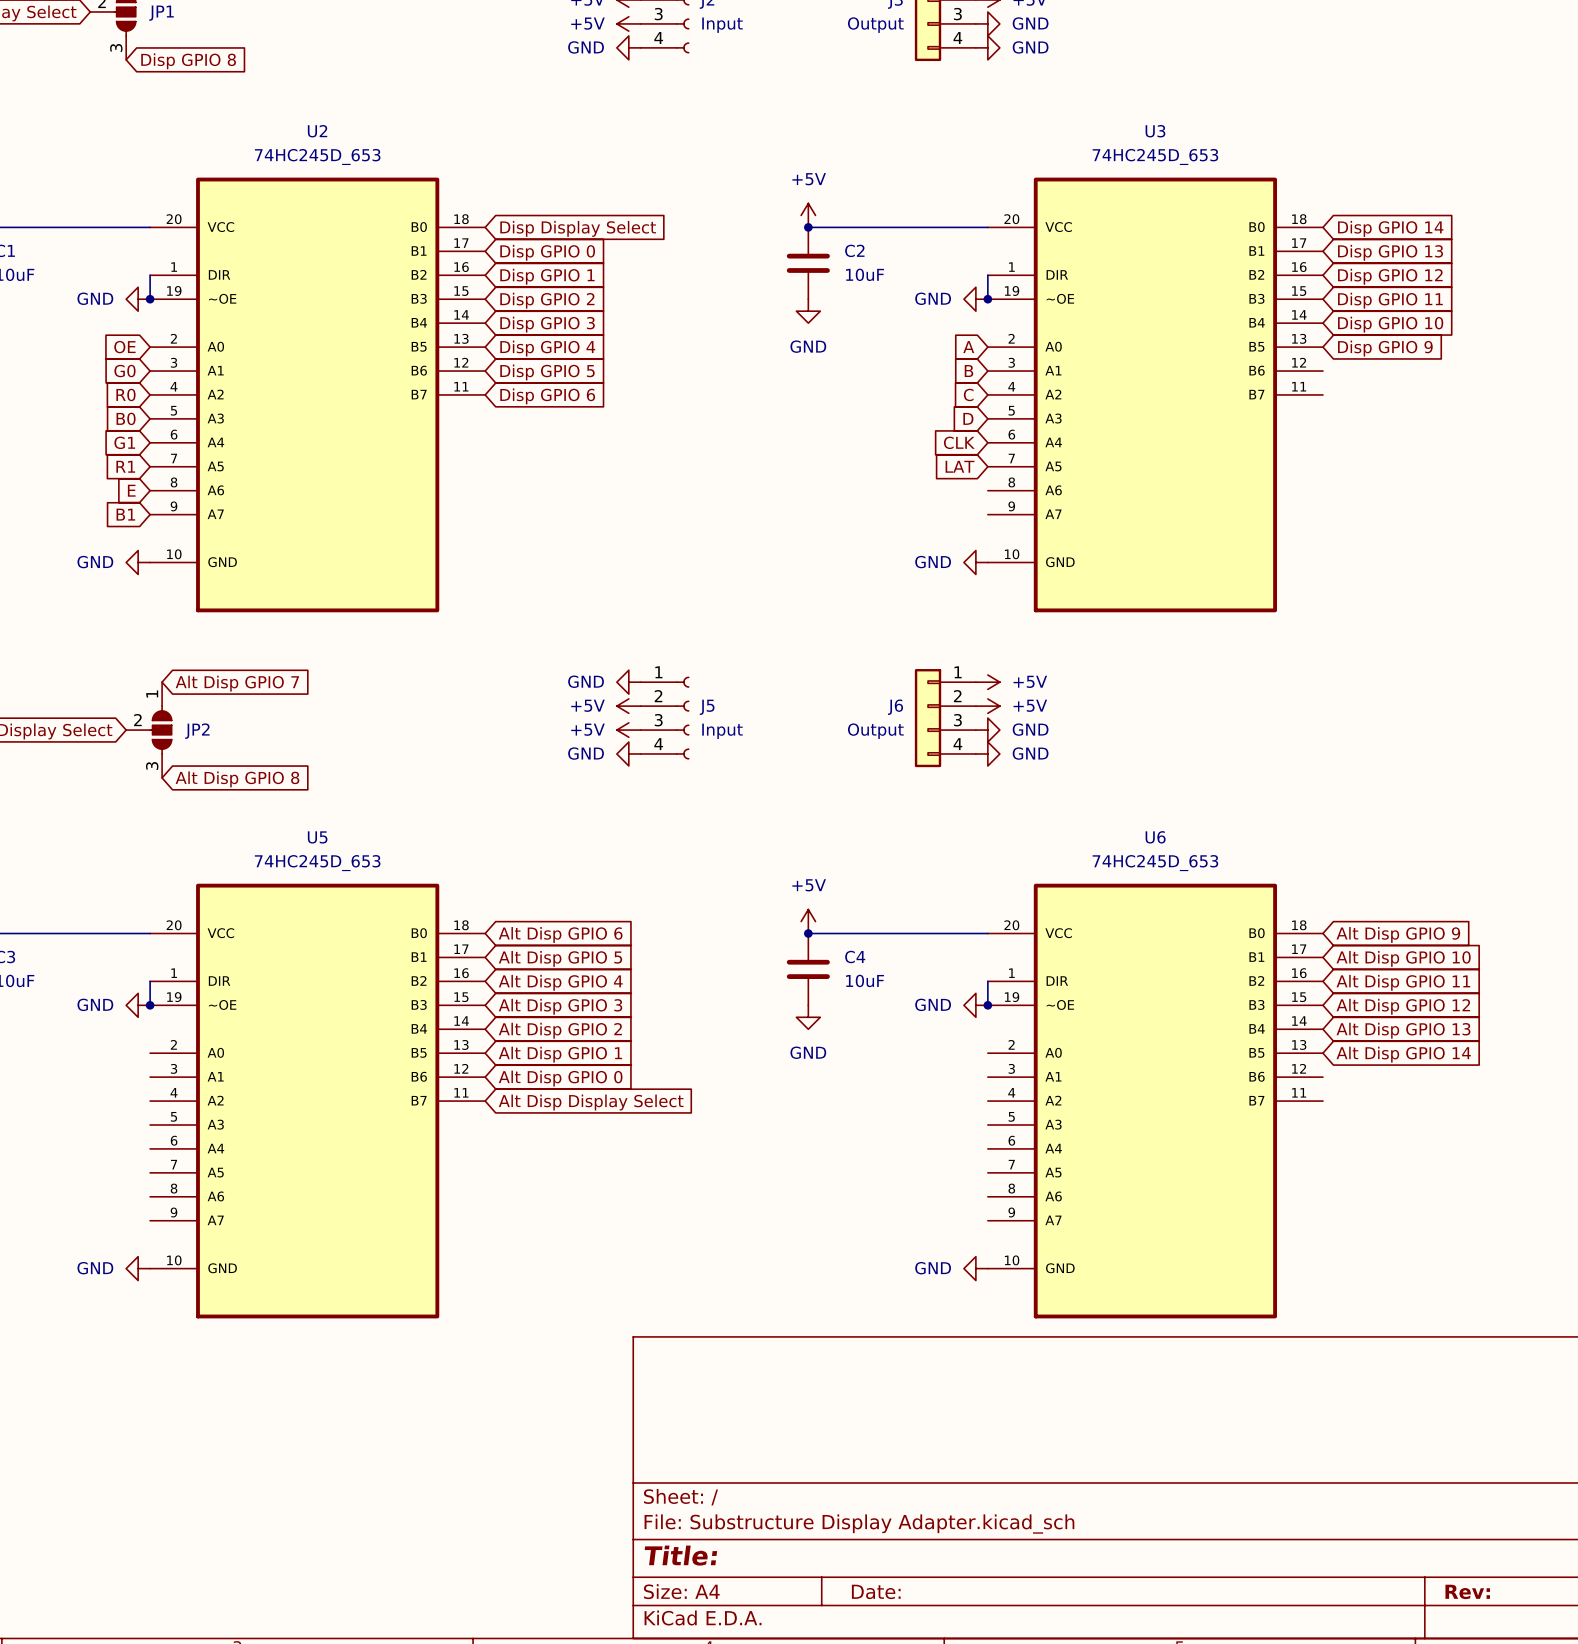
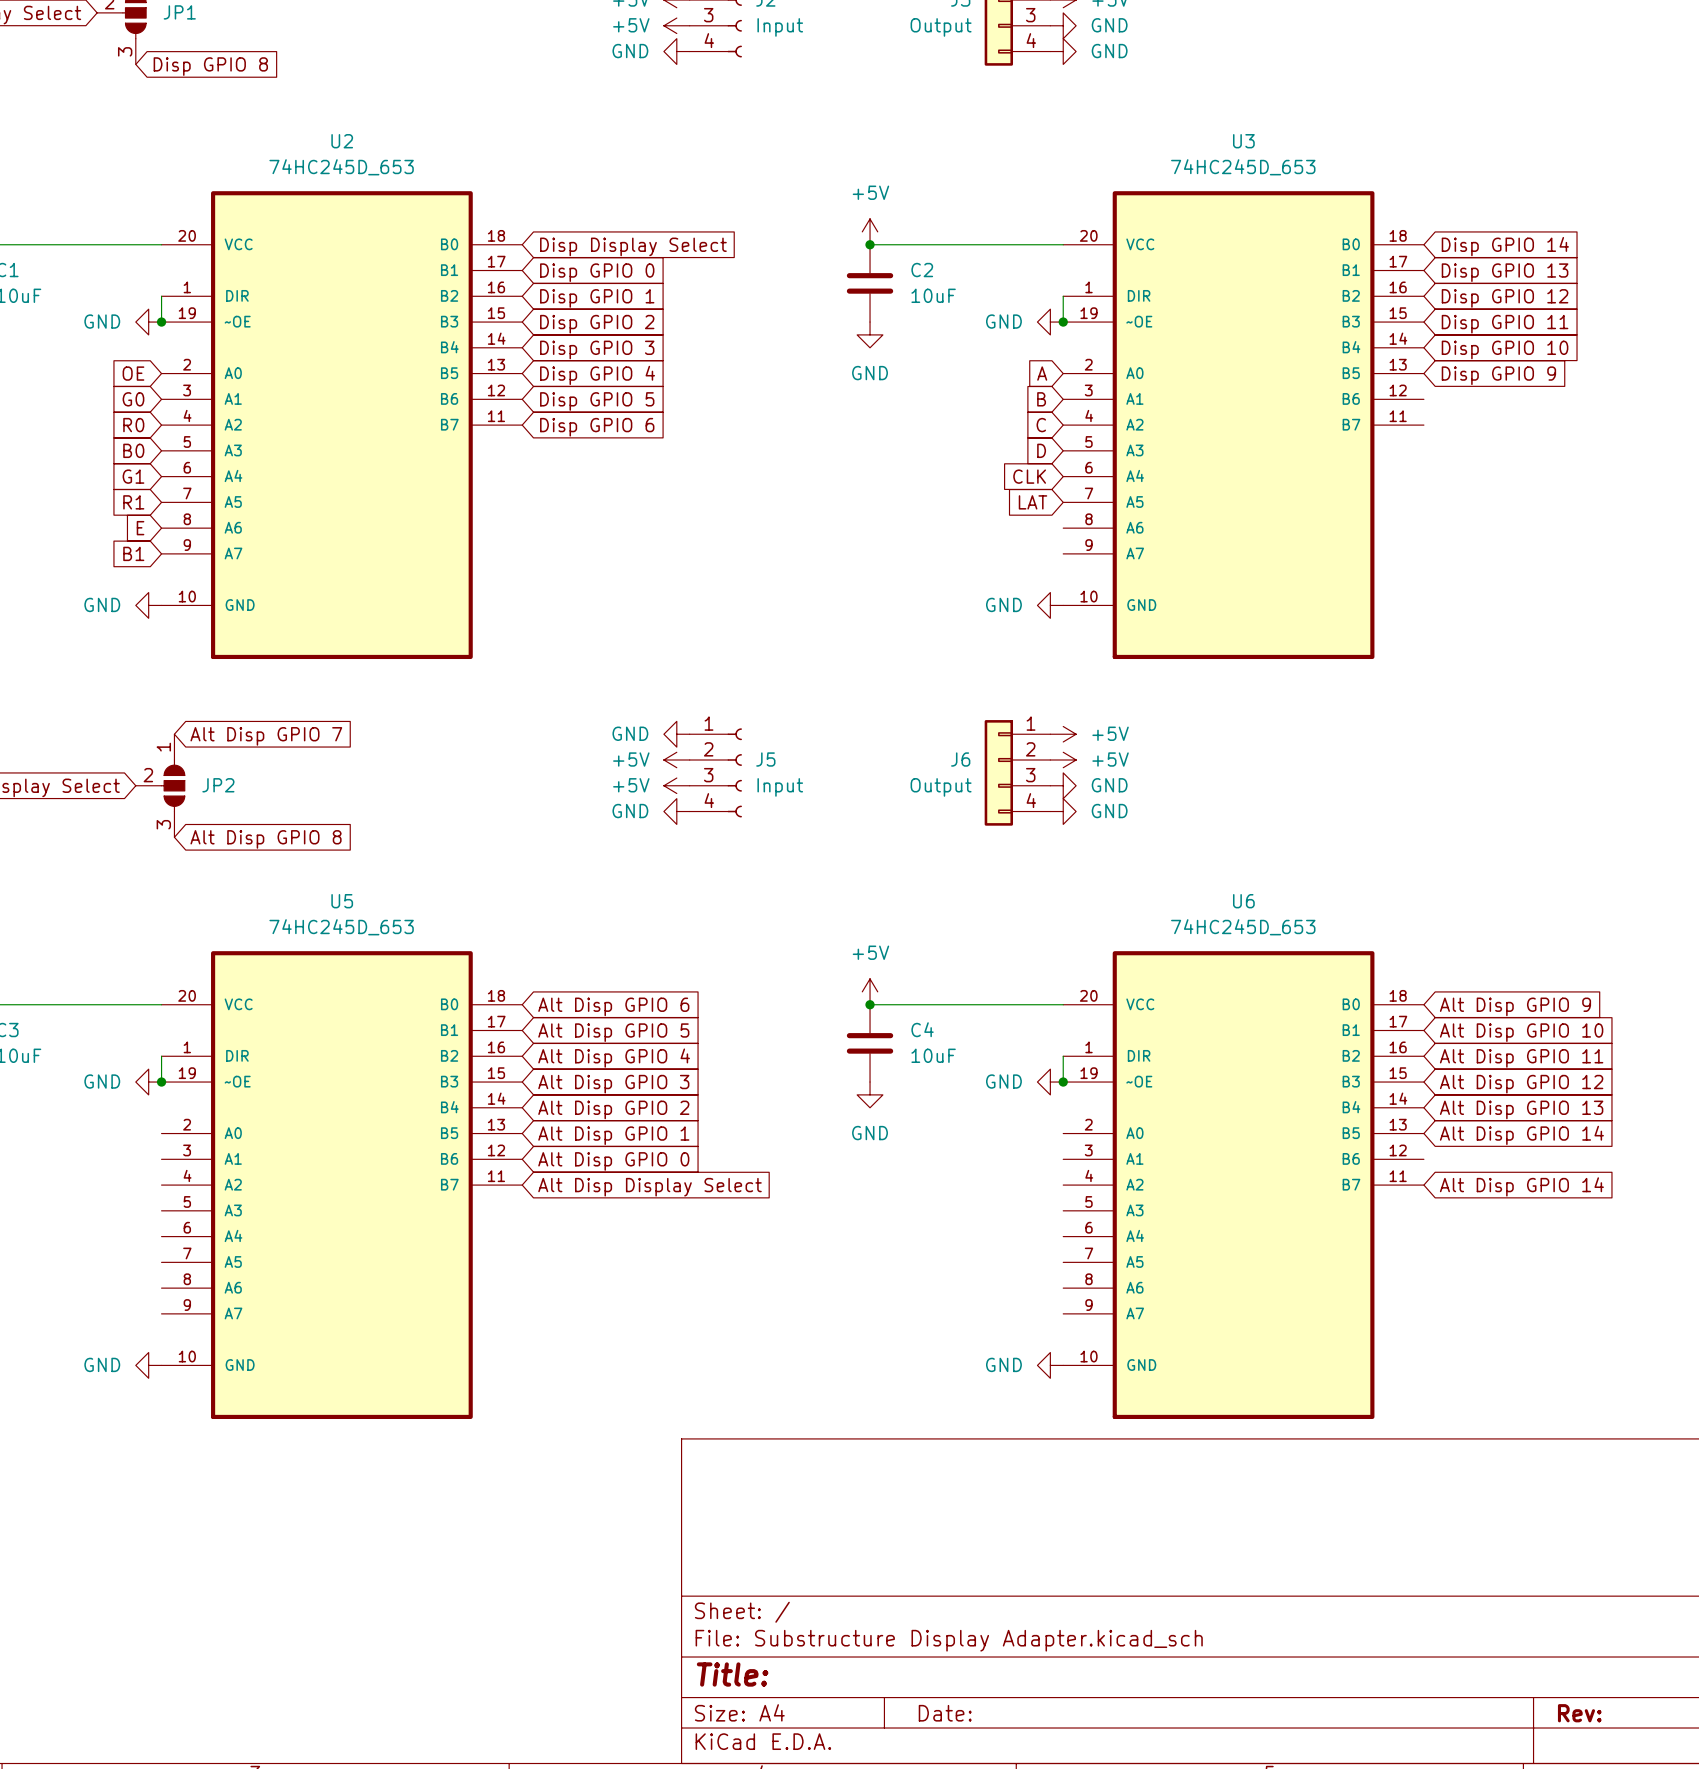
global label: none -> Alt Disp GPIO 14 (1521, 1186)

